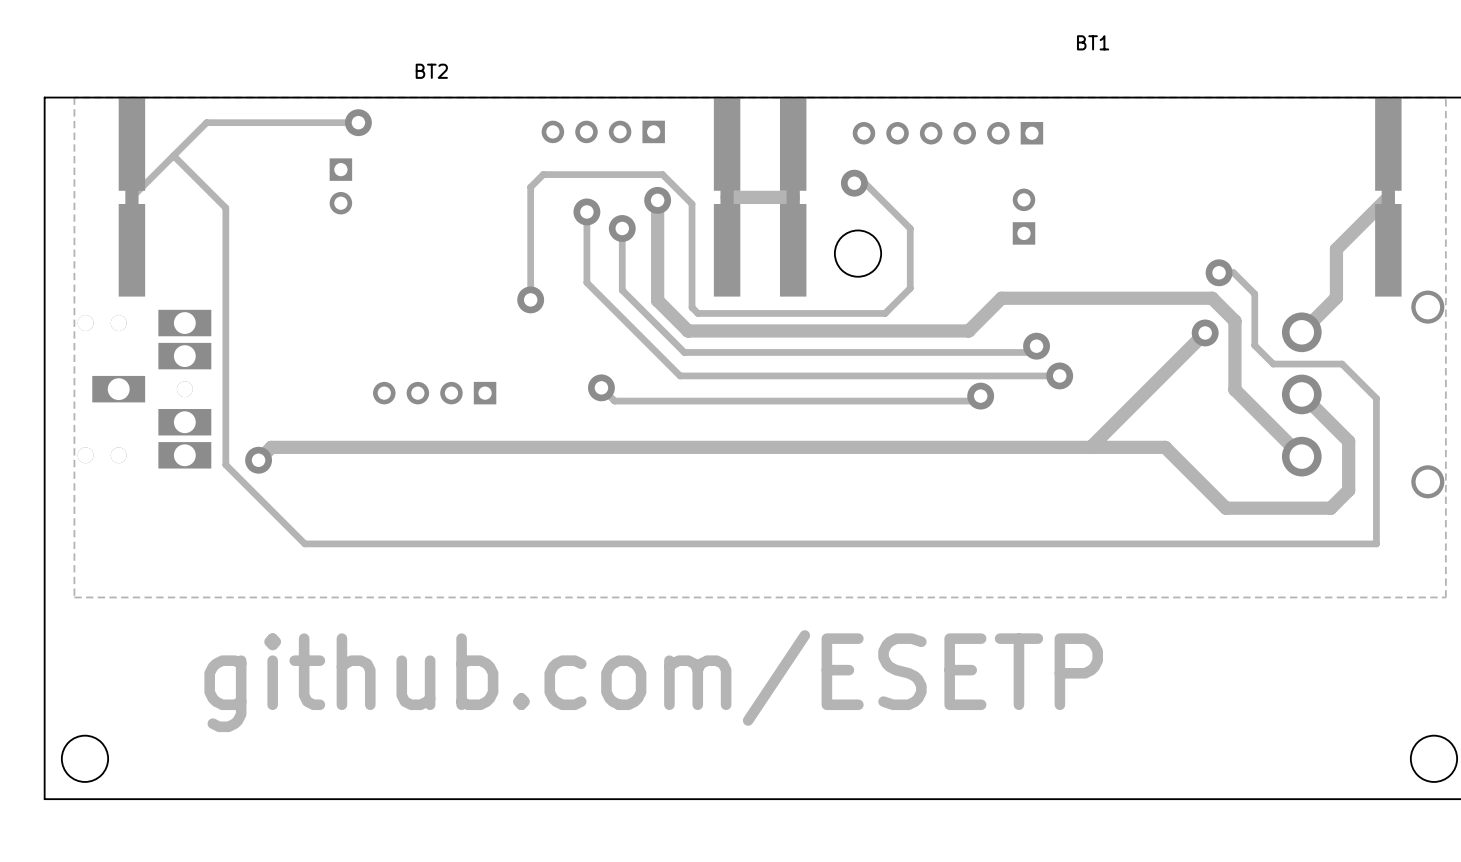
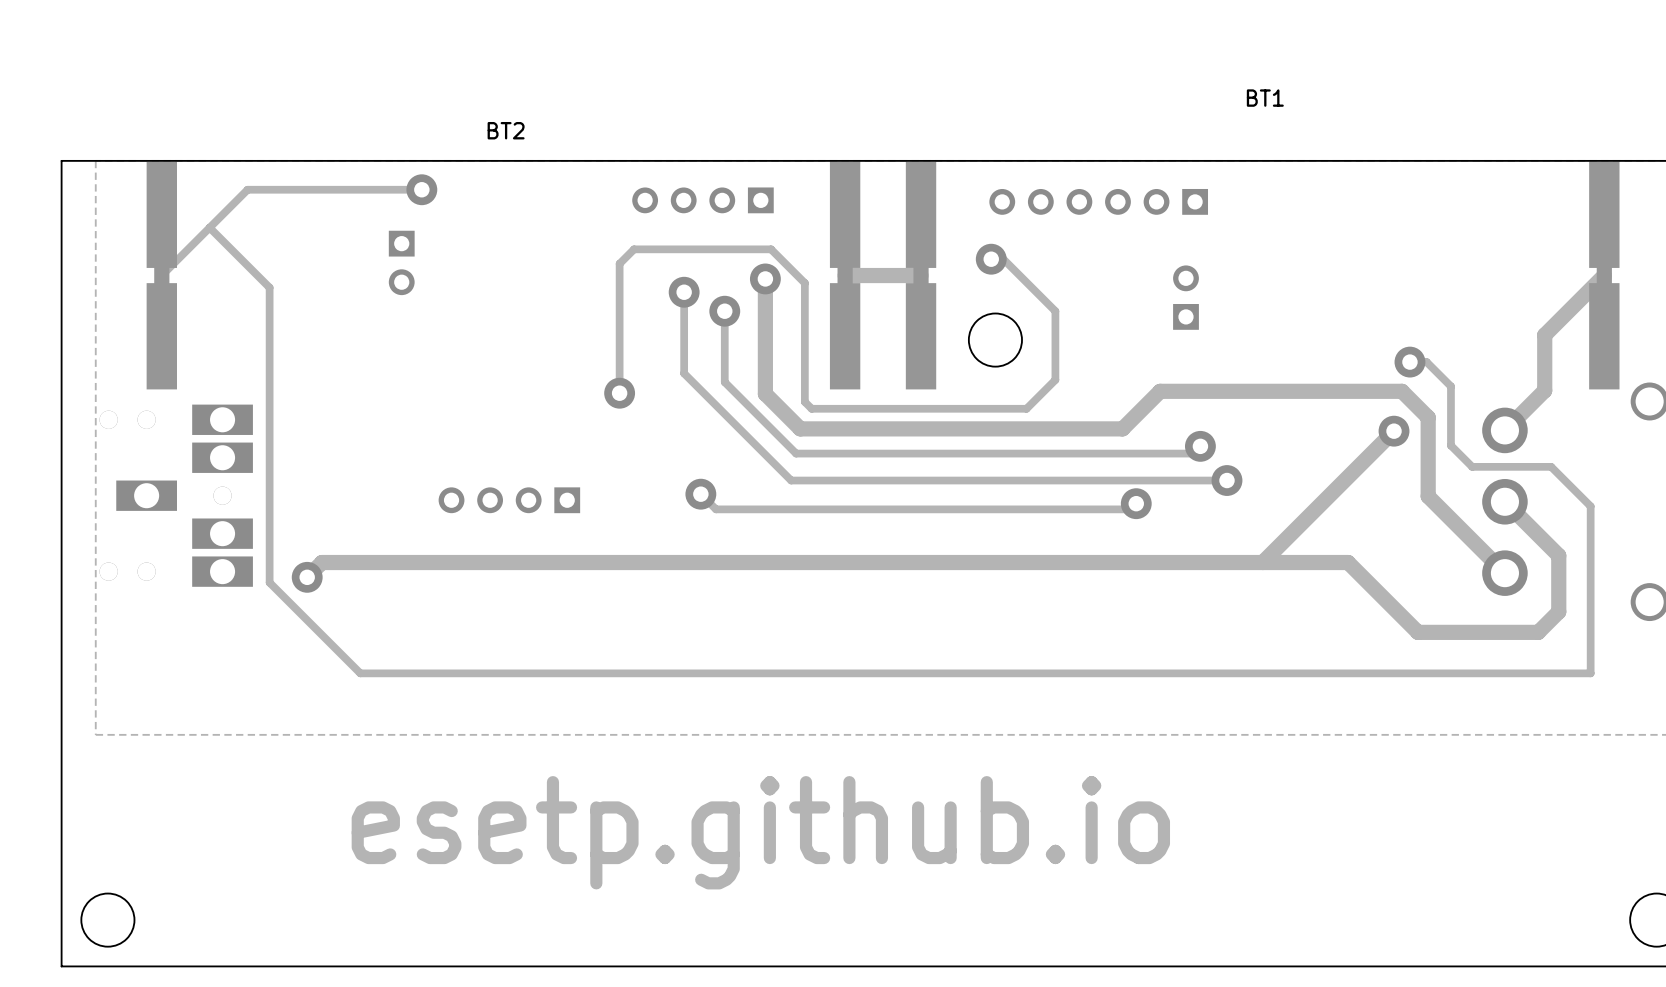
text: github.com/ESETP (653, 681) -> esetp.github.io (760, 832)

